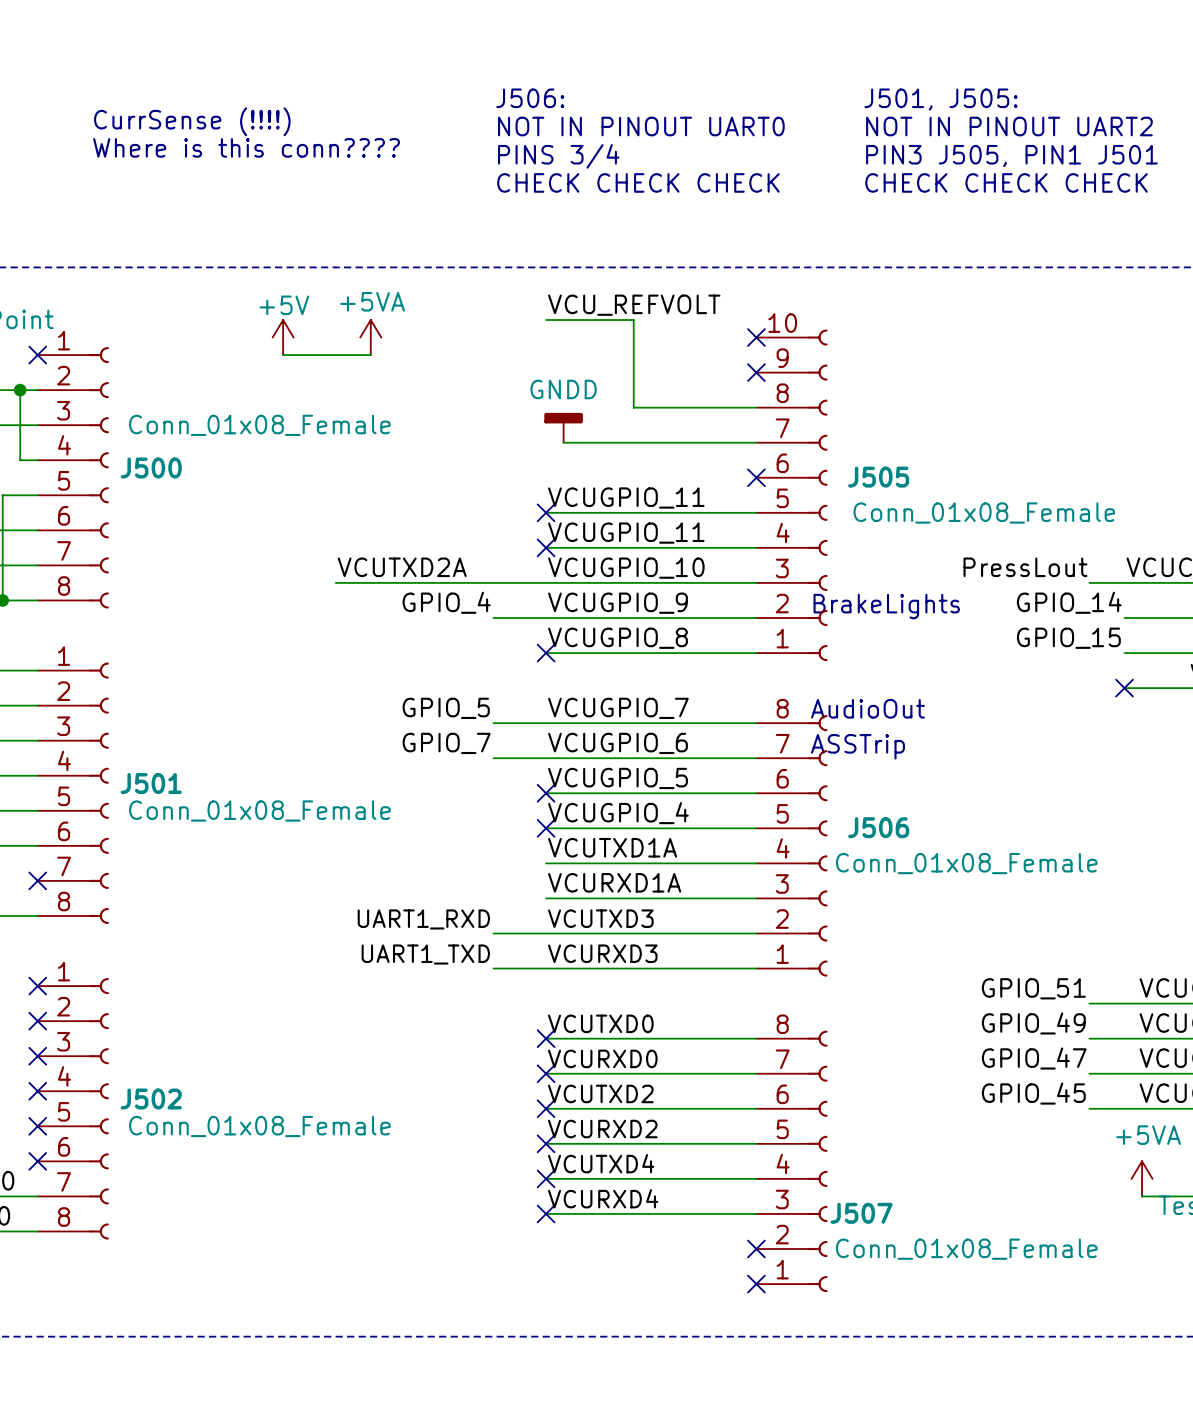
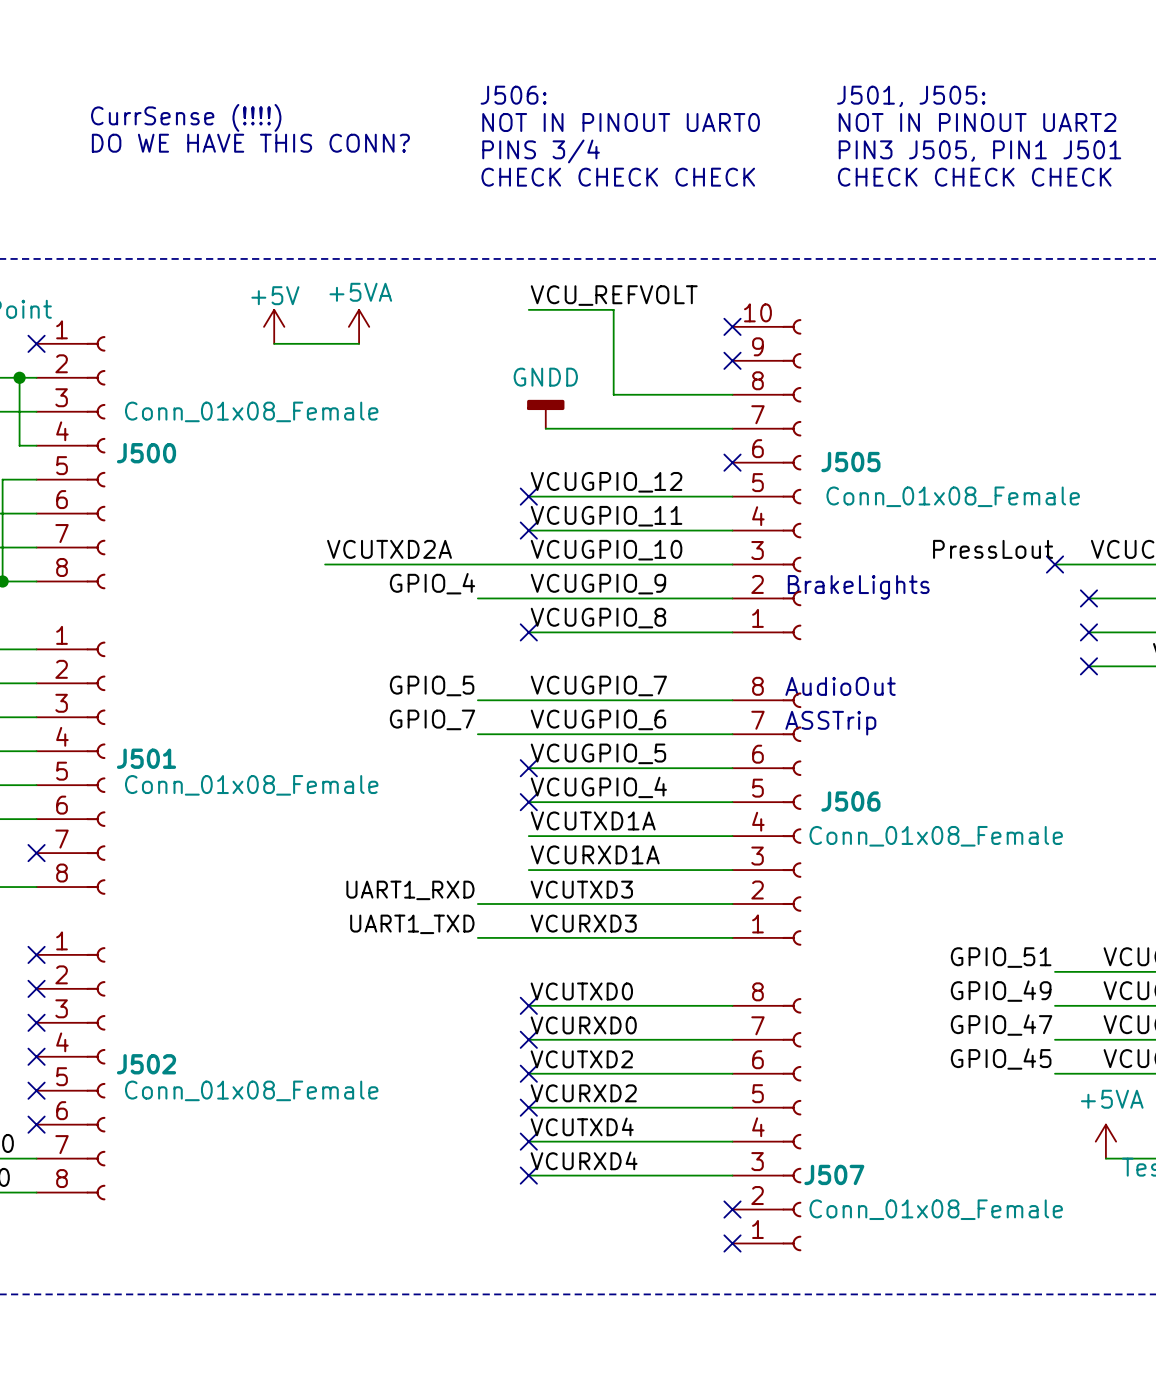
text: Where is this conn???? (246, 147) -> DO WE HAVE THIS CONN? (250, 143)
label: VCUGPIO_11 (626, 498) -> VCUGPIO_12 (606, 482)
no-connect mark: none -> (1055, 564)
label: GPIO_14 (1069, 602) -> none
no-connect mark: none -> (1088, 598)
label: GPIO_15 (1068, 638) -> none
no-connect mark: none -> (1088, 632)

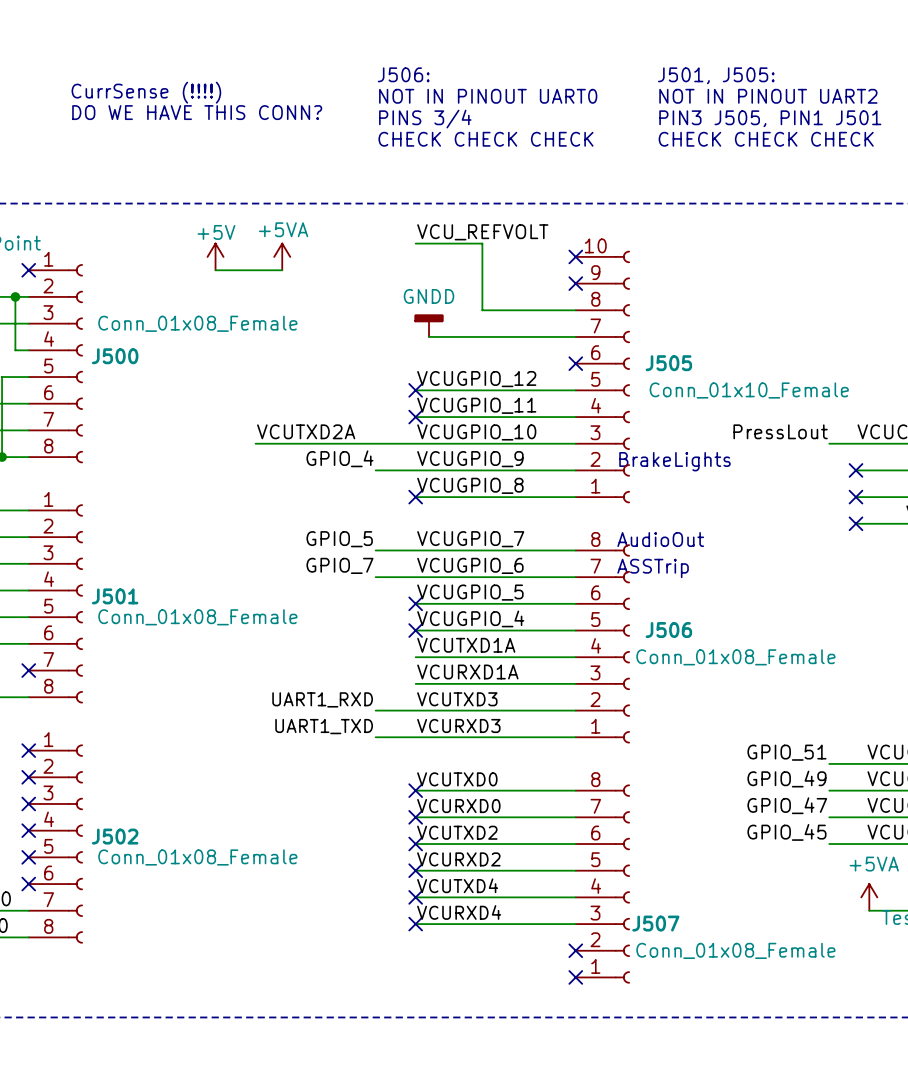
J505 value: Conn_01x08_Female (953, 496) -> Conn_01x10_Female (749, 390)
no-connect mark: (1055, 564) -> none

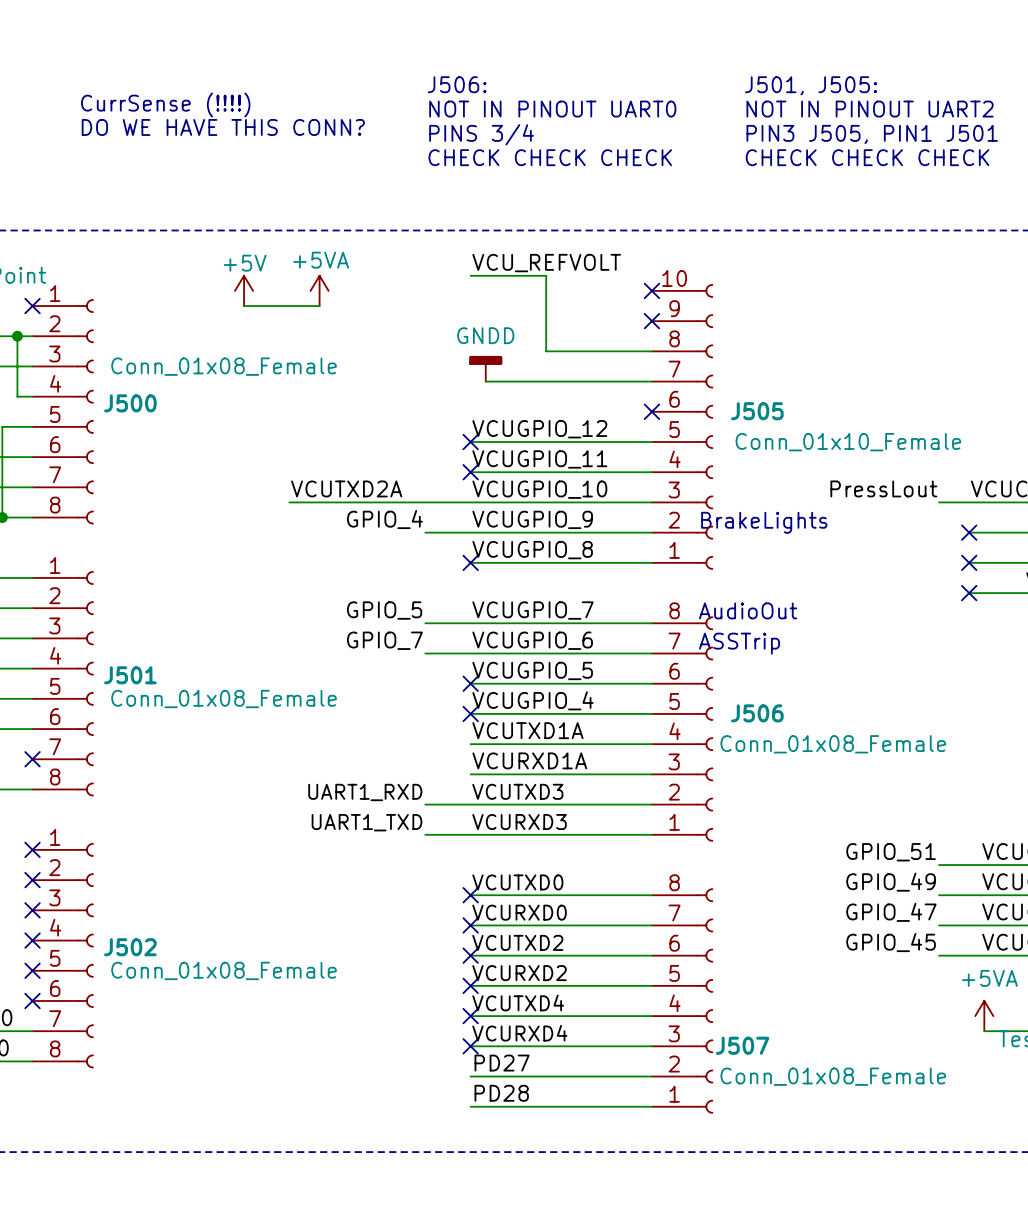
label: none -> PD27 (502, 1063)
wire: none -> (470, 1076) (651, 1076)
no-connect mark: (575, 950) -> none
label: none -> PD28 (501, 1093)
wire: none -> (470, 1106) (651, 1106)
no-connect mark: (575, 977) -> none

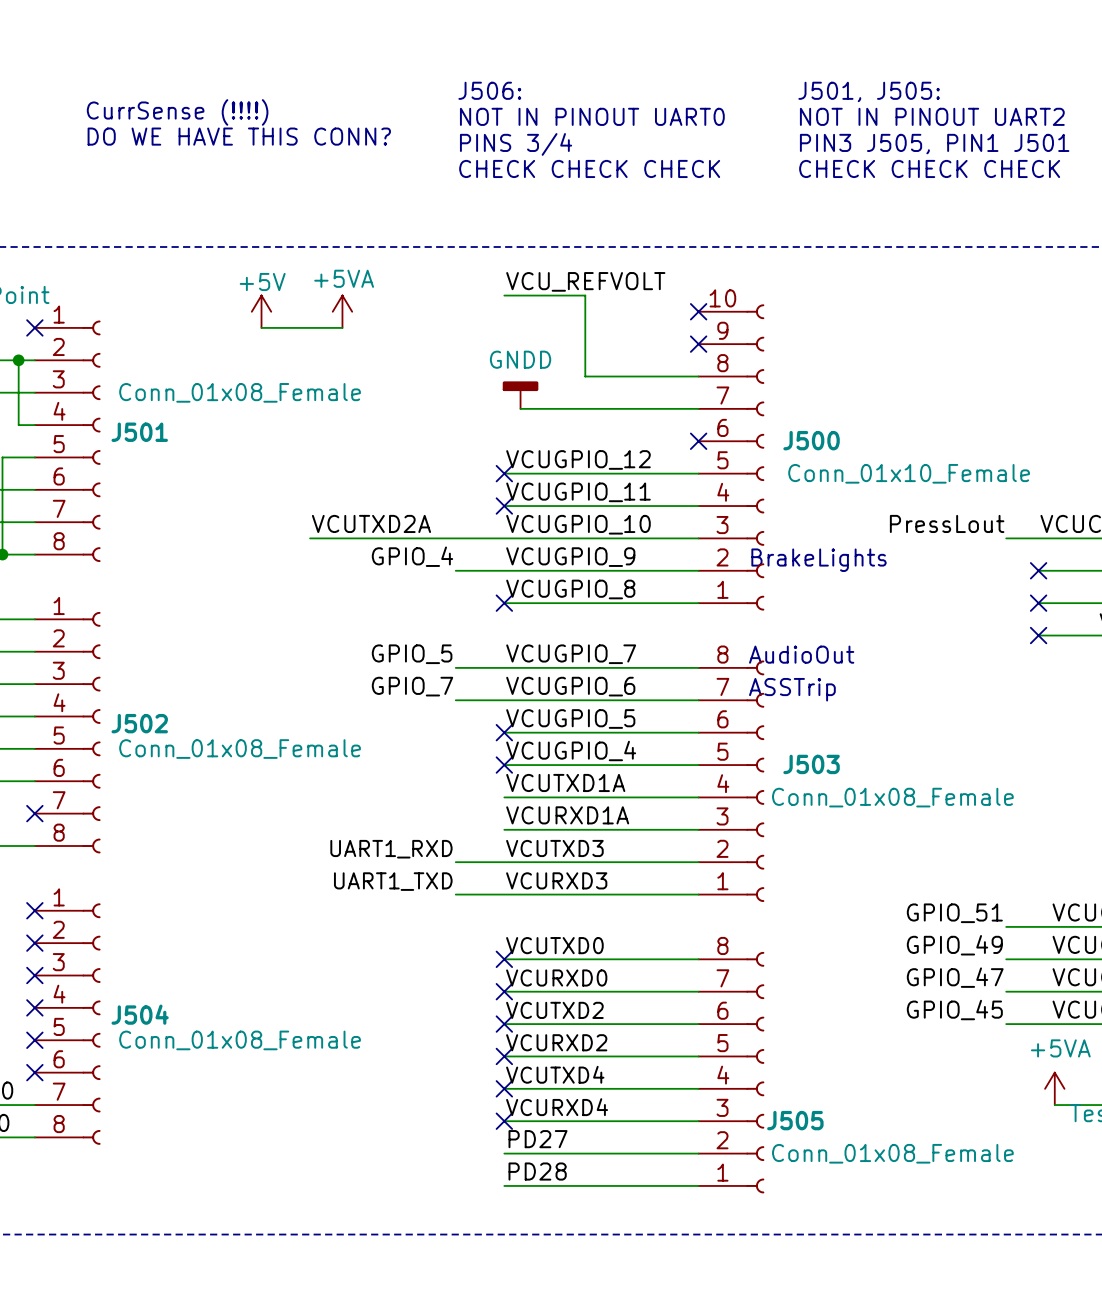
J500 name: J500 (130, 403) -> J501 (139, 432)
J505 name: J505 (757, 411) -> J500 (811, 440)
J501 name: J501 (130, 675) -> J502 (139, 723)
J506 name: J506 (757, 713) -> J503 (811, 764)
J502 name: J502 (130, 947) -> J504 (140, 1014)
J507 name: J507 (742, 1045) -> J505 (795, 1120)

